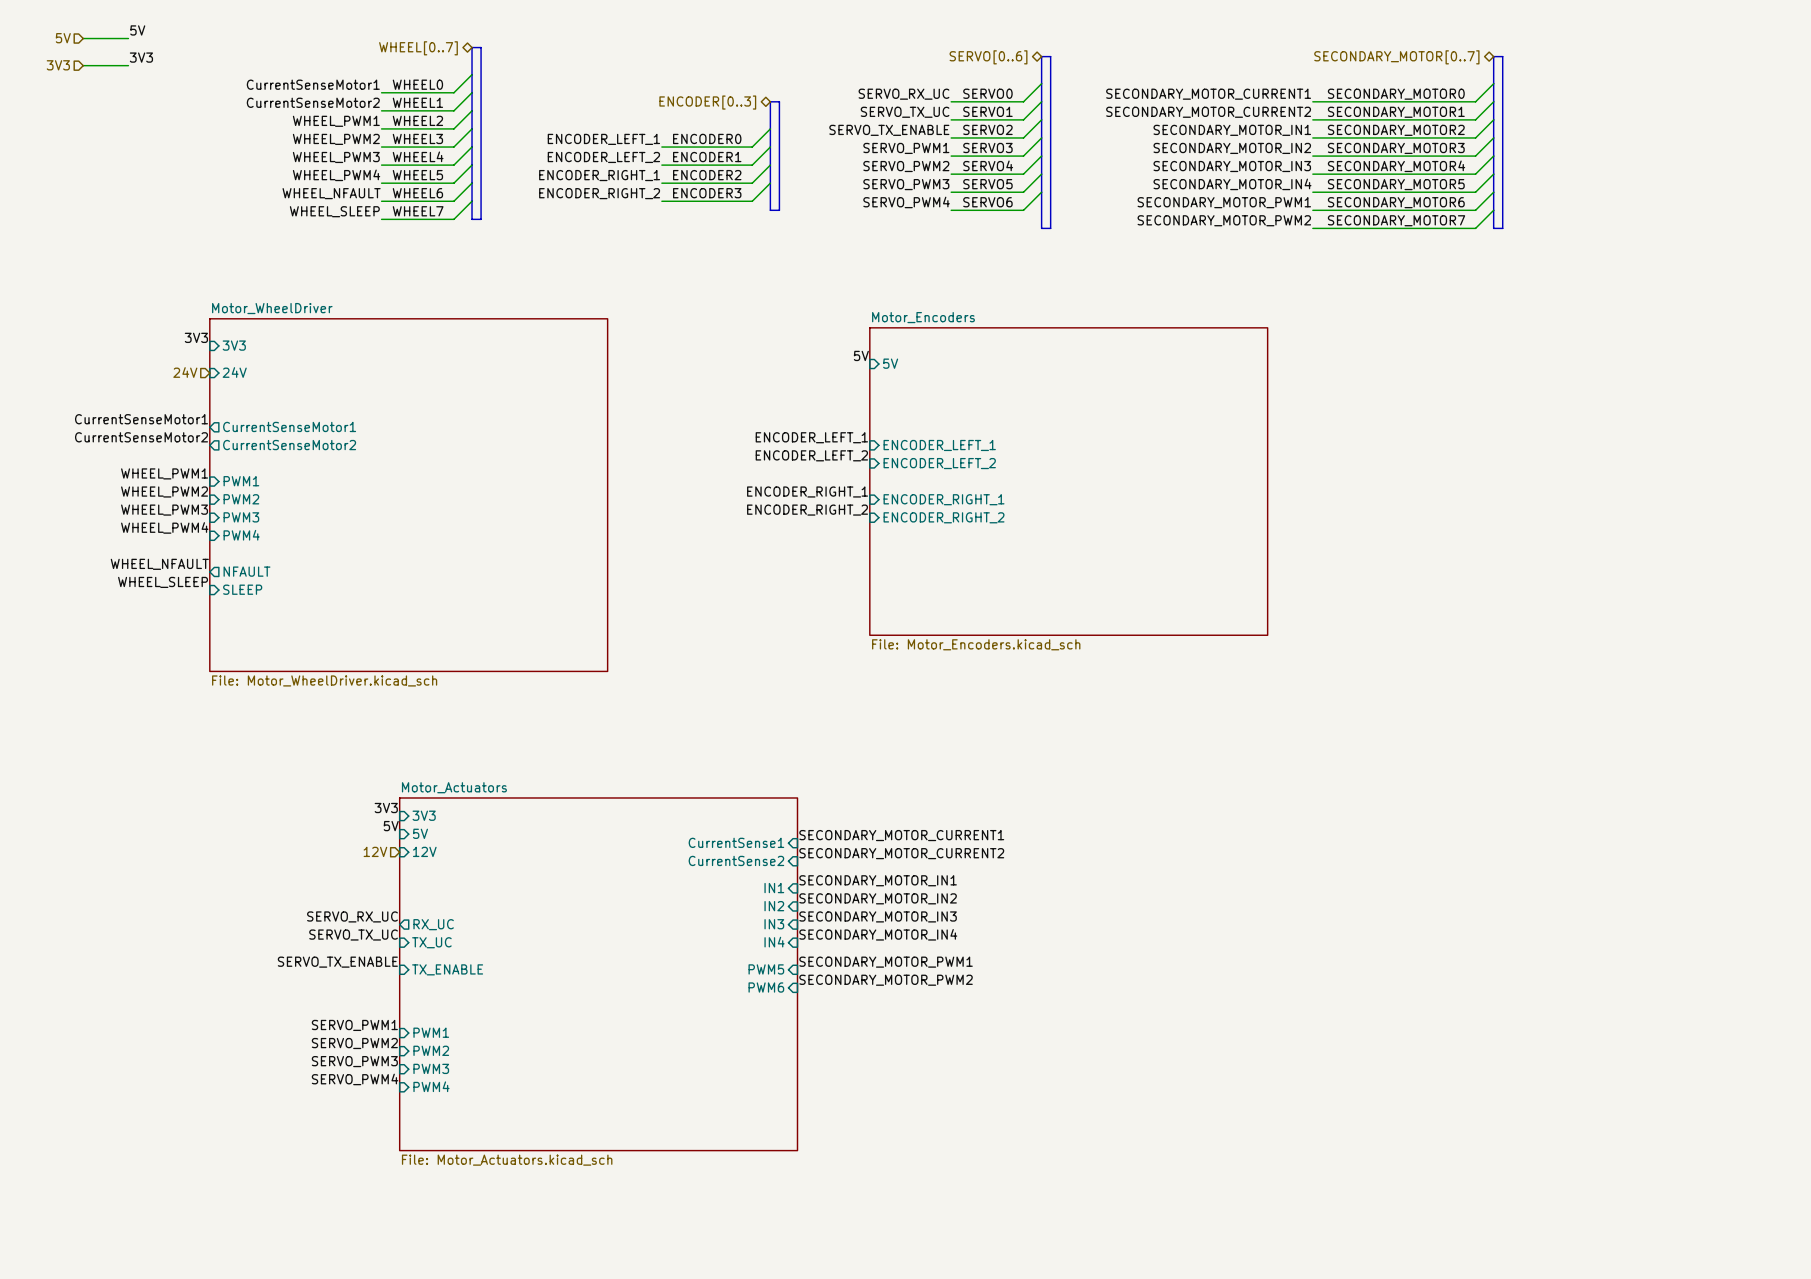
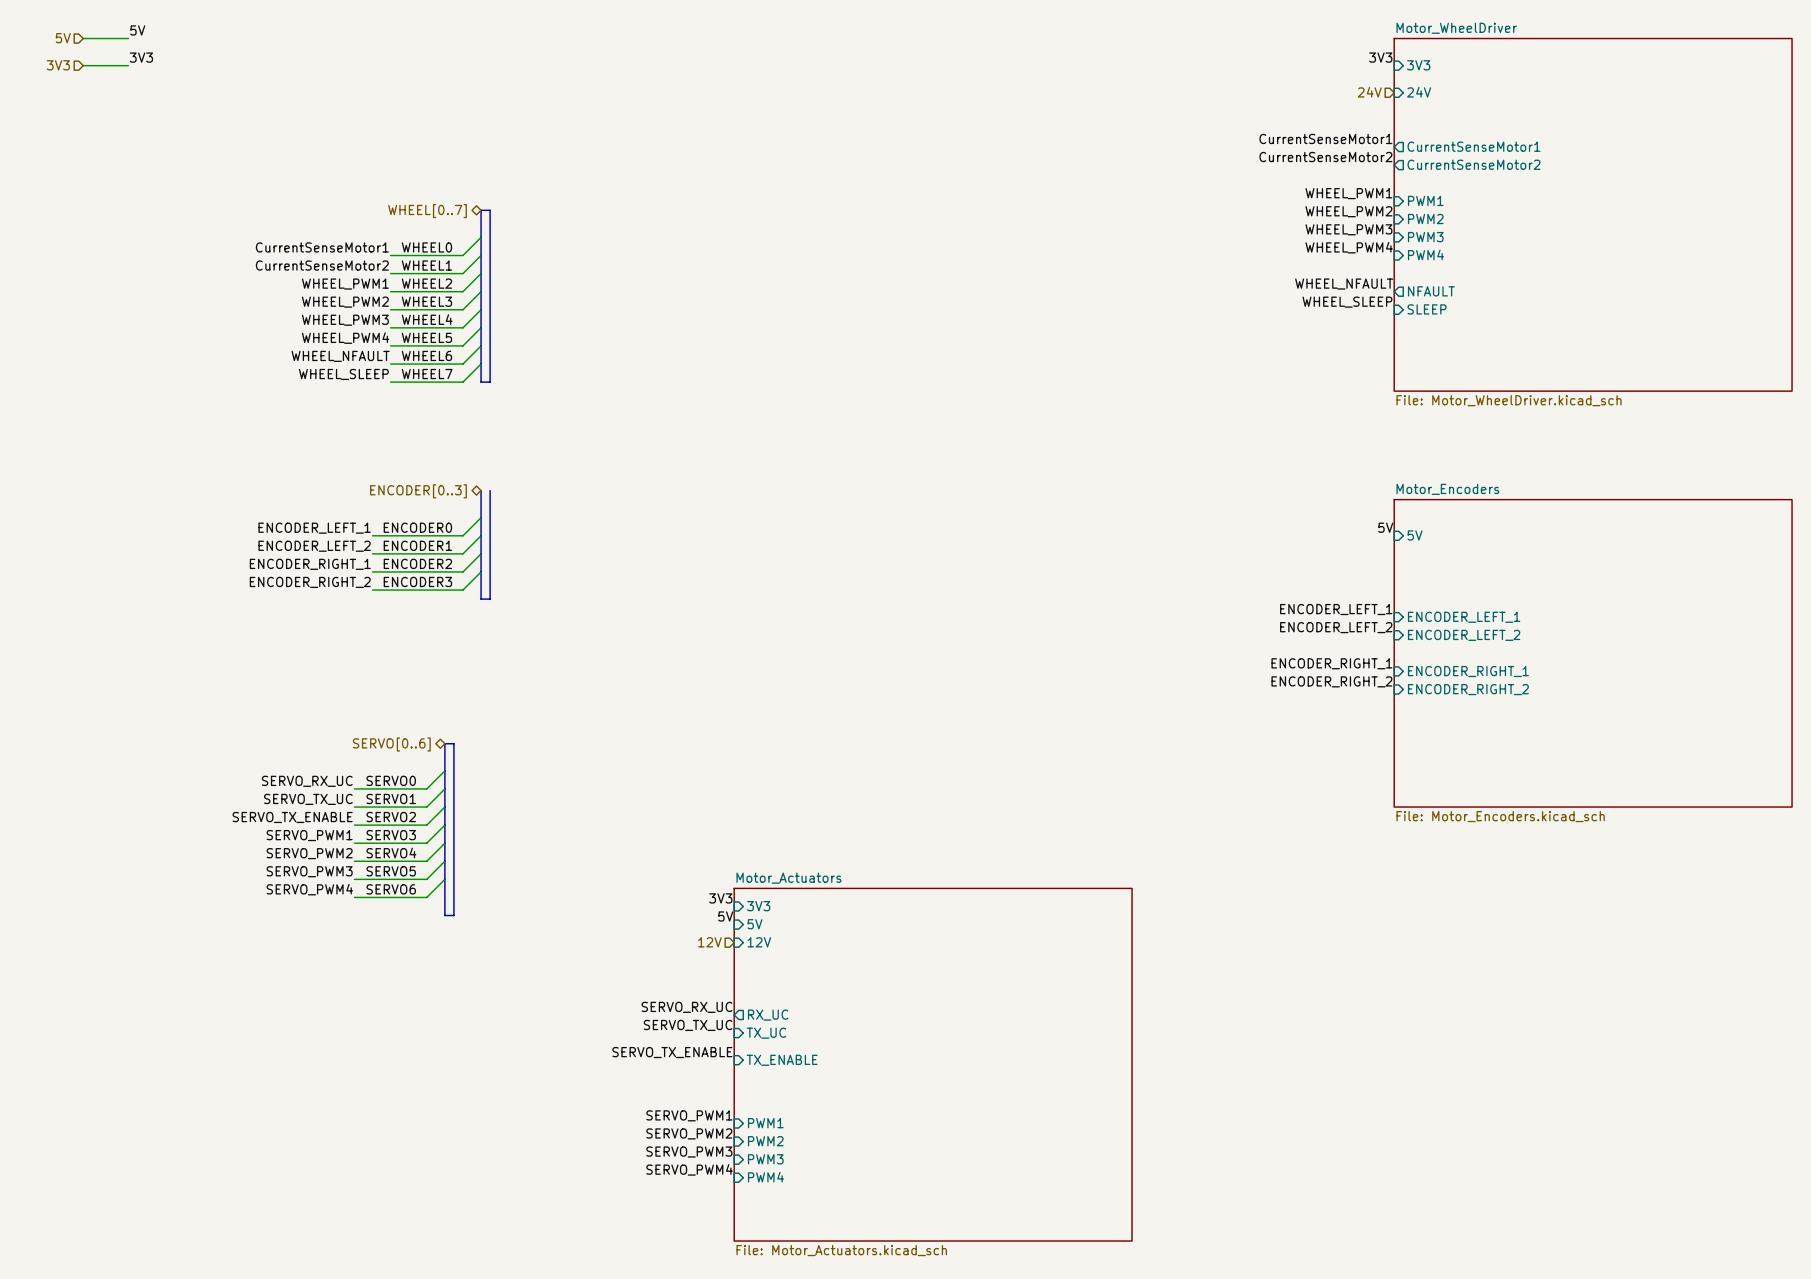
hierarchical label position: WHEEL[0..7] (418, 48) -> WHEEL[0..7] (427, 211)
bus: (1041, 56) (1041, 228) (1050, 228) (1050, 56) (1041, 56) -> none
bus: (1493, 56) (1493, 228) (1502, 228) (1502, 56) (1493, 56) -> none
hierarchical label: SERVO[0..6] (988, 57) -> none
label: none -> 3V3 (1380, 57)
hierarchical label: SECONDARY_MOTOR[0..7] (1396, 57) -> none
sheet pin: none -> 3V3 (1418, 65)
wire: (472, 74) (453, 92) (381, 92) -> (481, 237) (462, 255) (390, 255)
wire: (1041, 83) (1023, 101) (951, 101) -> none
wire: (1493, 83) (1475, 101) (1312, 101) -> none
label: CurrentSenseMotor1 (313, 84) -> none
label position: WHEEL0 (417, 84) -> WHEEL0 (426, 247)
wire: (472, 92) (453, 110) (381, 110) -> (481, 255) (462, 273) (390, 273)
hierarchical label: none -> 24V (1369, 92)
sheet pin: none -> 24V (1419, 92)
label: SERVO0 (987, 93) -> none
label: SERVO_RX_UC (903, 94) -> none
label: SECONDARY_MOTOR_CURRENT1 (1208, 94) -> none
label: SECONDARY_MOTOR0 (1396, 94) -> none
bus: (770, 101) (770, 210) (779, 210) (779, 101) (770, 101) -> none
wire: (1041, 101) (1023, 119) (951, 119) -> none
wire: (1493, 101) (1475, 119) (1312, 119) -> none
label: CurrentSenseMotor2 (313, 102) -> none
label position: WHEEL1 (417, 102) -> WHEEL1 (426, 265)
hierarchical label: ENCODER[0..3] (707, 102) -> none
wire: (472, 110) (453, 128) (381, 128) -> (481, 273) (462, 291) (390, 291)
label: SERVO1 (987, 111) -> none
label: SERVO_TX_UC (905, 112) -> none
label: SECONDARY_MOTOR_CURRENT2 (1208, 112) -> none
label: SECONDARY_MOTOR1 (1396, 112) -> none
wire: (1041, 119) (1023, 137) (951, 137) -> none
wire: (1493, 119) (1475, 137) (1312, 137) -> none
label position: WHEEL2 (417, 120) -> WHEEL2 (426, 283)
label: WHEEL_PWM1 (336, 121) -> none
wire: (472, 128) (453, 147) (381, 147) -> (481, 291) (462, 309) (390, 309)
wire: (770, 128) (752, 147) (661, 147) -> none
label: SERVO2 (987, 129) -> none
label: SERVO_TX_ENABLE (889, 130) -> none
label: SECONDARY_MOTOR_IN1 (1232, 130) -> none
label: SECONDARY_MOTOR2 (1396, 130) -> none
wire: (1041, 137) (1023, 156) (951, 156) -> none
wire: (1493, 137) (1475, 156) (1312, 156) -> none
label position: WHEEL3 (417, 138) -> WHEEL3 (426, 301)
label: ENCODER0 (707, 138) -> none
label: none -> CurrentSenseMotor1 (1325, 138)
label: WHEEL_PWM2 (336, 139) -> none
label: ENCODER_LEFT_1 (603, 139) -> none
sheet pin: none -> CurrentSenseMotor1 (1474, 146)
wire: (472, 147) (453, 165) (381, 165) -> (481, 309) (462, 327) (390, 327)
wire: (770, 147) (752, 165) (661, 165) -> none
label: SERVO3 (987, 147) -> none
label: SERVO_PWM1 (906, 148) -> none
label: SECONDARY_MOTOR_IN2 (1232, 148) -> none
label: SECONDARY_MOTOR3 (1396, 148) -> none
label position: WHEEL4 (418, 156) -> WHEEL4 (427, 319)
wire: (1041, 156) (1023, 174) (951, 174) -> none
wire: (1493, 156) (1475, 174) (1312, 174) -> none
label: WHEEL_PWM3 (336, 157) -> none
label: ENCODER_LEFT_2 (603, 157) -> none
label: ENCODER1 (707, 157) -> none
label: none -> CurrentSenseMotor2 (1325, 157)
sheet pin: none -> CurrentSenseMotor2 (1474, 164)
wire: (472, 165) (453, 183) (381, 183) -> (481, 327) (462, 345) (390, 345)
wire: (770, 165) (752, 183) (661, 183) -> none
label: SERVO4 (988, 165) -> none
label: SERVO_PWM2 (906, 166) -> none
label: SECONDARY_MOTOR_IN3 (1232, 166) -> none
label: SECONDARY_MOTOR4 (1396, 166) -> none
wire: (1041, 174) (1023, 192) (951, 192) -> none
wire: (1493, 174) (1475, 192) (1312, 192) -> none
label: WHEEL_PWM4 (336, 175) -> none
label position: WHEEL5 (417, 175) -> WHEEL5 (426, 337)
label: ENCODER_RIGHT_1 (599, 175) -> none
label: ENCODER2 (707, 175) -> none
wire: (472, 183) (453, 201) (381, 201) -> (481, 345) (462, 364) (390, 364)
wire: (770, 183) (752, 201) (661, 201) -> none
label: SERVO_PWM3 (906, 184) -> none
label: SERVO5 (987, 184) -> none
label: SECONDARY_MOTOR_IN4 (1232, 184) -> none
label: SECONDARY_MOTOR5 (1396, 184) -> none
wire: (1041, 192) (1023, 210) (951, 210) -> none
wire: (1493, 192) (1475, 210) (1312, 210) -> none
label: WHEEL_NFAULT (331, 193) -> none
label position: WHEEL6 (417, 193) -> WHEEL6 (426, 355)
label: ENCODER_RIGHT_2 (599, 193) -> none
label: ENCODER3 (707, 193) -> none
label: none -> WHEEL_PWM1 (1348, 193)
sheet pin: none -> PWM1 (1425, 200)
wire: (472, 201) (453, 219) (381, 219) -> (481, 364) (462, 382) (390, 382)
label: SERVO_PWM4 (906, 202) -> none
label: SERVO6 (987, 202) -> none
label: SECONDARY_MOTOR_PWM1 (1224, 202) -> none
label: SECONDARY_MOTOR6 (1396, 202) -> none
bus: (481, 210) (481, 47) (472, 47) (472, 219) (481, 219) -> (481, 210) (490, 210) (490, 382) (481, 382) (481, 219)
wire: (1493, 210) (1475, 228) (1312, 228) -> none
label: WHEEL_SLEEP (334, 211) -> none
label position: WHEEL7 (418, 211) -> WHEEL7 (427, 374)
label: none -> WHEEL_PWM2 (1348, 211)
sheet Motor_WheelDriver: none -> File: Motor_WheelDriver.kicad_sch (1593, 214)
sheet pin: none -> PWM2 (1425, 219)
label: SECONDARY_MOTOR_PWM2 (1224, 220) -> none
label: SECONDARY_MOTOR7 (1396, 220) -> none
label: none -> WHEEL_PWM3 (1348, 229)
sheet pin: none -> PWM3 (1425, 237)
label: none -> CurrentSenseMotor1 (322, 247)
label: none -> WHEEL_PWM4 (1349, 247)
sheet pin: none -> PWM4 (1426, 254)
label: none -> CurrentSenseMotor2 (322, 265)
label: none -> WHEEL_PWM1 (345, 284)
label: none -> WHEEL_NFAULT (1344, 284)
sheet pin: none -> NFAULT (1431, 291)
label: none -> WHEEL_PWM2 (345, 302)
label: none -> WHEEL_SLEEP (1347, 302)
sheet pin: none -> SLEEP (1427, 309)
label: none -> WHEEL_PWM3 (345, 320)
label: 3V3 (196, 337) -> none
label: none -> WHEEL_PWM4 (345, 338)
sheet pin: 3V3 (234, 345) -> none
label: 5V (861, 355) -> none
label: none -> WHEEL_NFAULT (340, 356)
sheet pin: 5V (890, 363) -> none
hierarchical label: 24V (185, 372) -> none
sheet pin: 24V (234, 372) -> none
label: none -> WHEEL_SLEEP (343, 374)
label: CurrentSenseMotor1 (141, 419) -> none
sheet pin: CurrentSenseMotor1 (289, 426) -> none
label: CurrentSenseMotor2 (141, 437) -> none
label: ENCODER_LEFT_1 (811, 437) -> none
sheet pin: CurrentSenseMotor2 (289, 445) -> none
sheet pin: ENCODER_LEFT_1 (939, 445) -> none
label: ENCODER_LEFT_2 (811, 455) -> none
sheet pin: ENCODER_LEFT_2 (939, 463) -> none
label: WHEEL_PWM1 (164, 473) -> none
sheet pin: PWM1 (241, 481) -> none
sheet Motor_Encoders: File: Motor_Encoders.kicad_sch (1068, 481) -> none
bus: none -> (481, 490) (481, 599) (490, 599) (490, 490)
label: WHEEL_PWM2 (164, 491) -> none
hierarchical label: none -> ENCODER[0..3] (418, 491)
label: ENCODER_RIGHT_1 (807, 491) -> none
sheet Motor_WheelDriver: File: Motor_WheelDriver.kicad_sch (408, 495) -> none
sheet pin: PWM2 (241, 499) -> none
sheet pin: ENCODER_RIGHT_1 (944, 499) -> none
label: WHEEL_PWM3 (164, 510) -> none
label: ENCODER_RIGHT_2 (807, 510) -> none
sheet pin: PWM3 (241, 517) -> none
wire: none -> (481, 517) (462, 535) (372, 535)
sheet pin: ENCODER_RIGHT_2 (944, 517) -> none
label: WHEEL_PWM4 (164, 527) -> none
label: none -> ENCODER0 (417, 527)
label: none -> 5V (1385, 527)
label: none -> ENCODER_LEFT_1 (314, 528)
sheet pin: PWM4 (241, 535) -> none
wire: none -> (481, 535) (462, 553) (372, 553)
sheet pin: none -> 5V (1415, 535)
label: none -> ENCODER1 (417, 545)
label: none -> ENCODER_LEFT_2 (314, 546)
wire: none -> (481, 553) (462, 571) (372, 571)
label: none -> ENCODER2 (417, 563)
label: WHEEL_NFAULT (159, 564) -> none
label: none -> ENCODER_RIGHT_1 (310, 564)
sheet pin: NFAULT (246, 571) -> none
wire: none -> (481, 571) (462, 590) (372, 590)
label: none -> ENCODER3 (417, 581)
label: WHEEL_SLEEP (163, 582) -> none
label: none -> ENCODER_RIGHT_2 (310, 582)
sheet pin: SLEEP (242, 589) -> none
label: none -> ENCODER_LEFT_1 (1336, 609)
sheet pin: none -> ENCODER_LEFT_1 (1464, 617)
label: none -> ENCODER_LEFT_2 (1336, 627)
sheet pin: none -> ENCODER_LEFT_2 (1464, 635)
sheet Motor_Encoders: none -> File: Motor_Encoders.kicad_sch (1593, 653)
label: none -> ENCODER_RIGHT_1 (1331, 663)
sheet pin: none -> ENCODER_RIGHT_1 (1468, 671)
label: none -> ENCODER_RIGHT_2 (1331, 681)
sheet pin: none -> ENCODER_RIGHT_2 (1468, 689)
bus: none -> (444, 743) (444, 915) (453, 915) (453, 743) (444, 743)
hierarchical label: none -> SERVO[0..6] (391, 744)
wire: none -> (444, 770) (426, 788) (354, 788)
label: none -> SERVO0 (391, 780)
wire: none -> (444, 788) (426, 807) (354, 807)
label: none -> SERVO1 (391, 798)
wire: none -> (444, 807) (426, 825) (354, 825)
label: 3V3 (386, 808) -> none
sheet pin: 3V3 (424, 815) -> none
label: none -> SERVO2 (391, 817)
wire: none -> (444, 825) (426, 843) (354, 843)
label: 5V (391, 826) -> none
sheet pin: 5V (420, 833) -> none
label: none -> SERVO_PWM1 (309, 835)
label: none -> SERVO3 (391, 835)
label: SECONDARY_MOTOR_CURRENT1 (901, 835) -> none
sheet pin: CurrentSense1 (736, 842) -> none
wire: none -> (444, 843) (426, 861) (354, 861)
hierarchical label: 12V (375, 851) -> none
sheet pin: 12V (424, 851) -> none
label: none -> SERVO4 (391, 852)
label: none -> SERVO_PWM2 (309, 853)
label: SECONDARY_MOTOR_CURRENT2 (901, 853) -> none
sheet pin: CurrentSense2 (736, 860) -> none
wire: none -> (444, 861) (426, 879) (354, 879)
label: none -> SERVO_PWM3 (309, 871)
label: none -> SERVO5 (391, 871)
wire: none -> (444, 879) (426, 897) (354, 897)
label: SECONDARY_MOTOR_IN1 (878, 880) -> none
sheet pin: IN1 (774, 888) -> none
label: none -> SERVO_PWM4 (309, 889)
label: none -> SERVO6 (391, 889)
label: none -> 3V3 (720, 898)
label: SECONDARY_MOTOR_IN2 (878, 898) -> none
sheet pin: none -> 3V3 (758, 906)
sheet pin: IN2 (774, 906) -> none
label position: SERVO_RX_UC (352, 916) -> SERVO_RX_UC (307, 781)
label: none -> 5V (725, 916)
label: SECONDARY_MOTOR_IN3 (878, 916) -> none
sheet pin: RX_UC (433, 924) -> none
sheet pin: none -> 5V (755, 924)
sheet pin: IN3 (774, 924) -> none
label: SECONDARY_MOTOR_IN4 (878, 934) -> none
label position: SERVO_TX_UC (353, 935) -> SERVO_TX_UC (308, 799)
sheet pin: TX_UC (431, 942) -> none
hierarchical label: none -> 12V (709, 942)
sheet pin: none -> 12V (759, 942)
sheet pin: IN4 (774, 942) -> none
label position: SERVO_TX_ENABLE (337, 962) -> SERVO_TX_ENABLE (292, 817)
label: SECONDARY_MOTOR_PWM1 (886, 962) -> none
sheet pin: TX_ENABLE (447, 969) -> none
sheet pin: PWM5 (766, 969) -> none
sheet Motor_Actuators: File: Motor_Actuators.kicad_sch (598, 974) -> none
label: SECONDARY_MOTOR_PWM2 (886, 980) -> none
sheet pin: PWM6 (766, 987) -> none
label: none -> SERVO_RX_UC (686, 1007)
sheet pin: none -> RX_UC (768, 1015)
label: SERVO_PWM1 (354, 1025) -> none
label: none -> SERVO_TX_UC (688, 1025)
sheet pin: PWM1 (431, 1032) -> none
sheet pin: none -> TX_UC (766, 1033)
label: SERVO_PWM2 (354, 1043) -> none
sheet pin: PWM2 (431, 1050) -> none
label: none -> SERVO_TX_ENABLE (672, 1052)
sheet pin: none -> TX_ENABLE (782, 1060)
label: SERVO_PWM3 (354, 1061) -> none
sheet Motor_Actuators: none -> File: Motor_Actuators.kicad_sch (933, 1064)
sheet pin: PWM3 (431, 1068) -> none
label: SERVO_PWM4 (355, 1079) -> none
sheet pin: PWM4 (431, 1086) -> none
label: none -> SERVO_PWM1 (689, 1115)
sheet pin: none -> PWM1 (765, 1123)
label: none -> SERVO_PWM2 (689, 1133)
sheet pin: none -> PWM2 (765, 1141)
label: none -> SERVO_PWM3 (689, 1152)
sheet pin: none -> PWM3 (765, 1159)
label: none -> SERVO_PWM4 (689, 1169)
sheet pin: none -> PWM4 (765, 1177)

